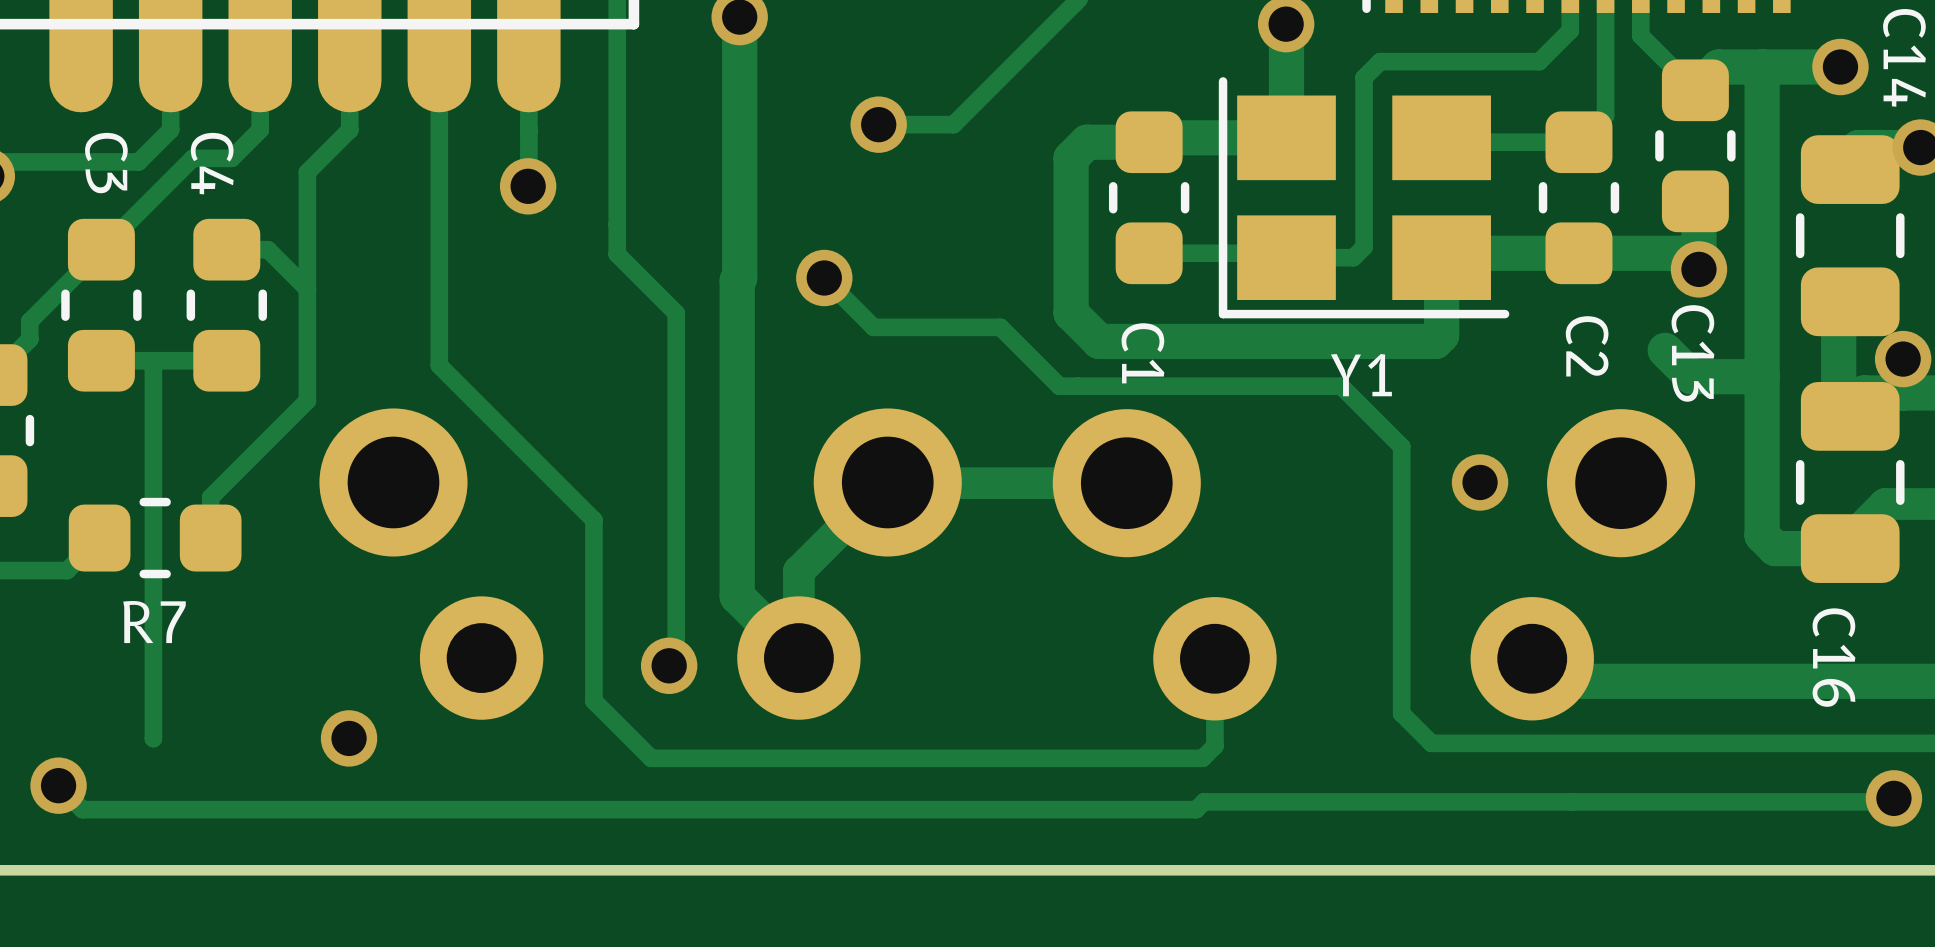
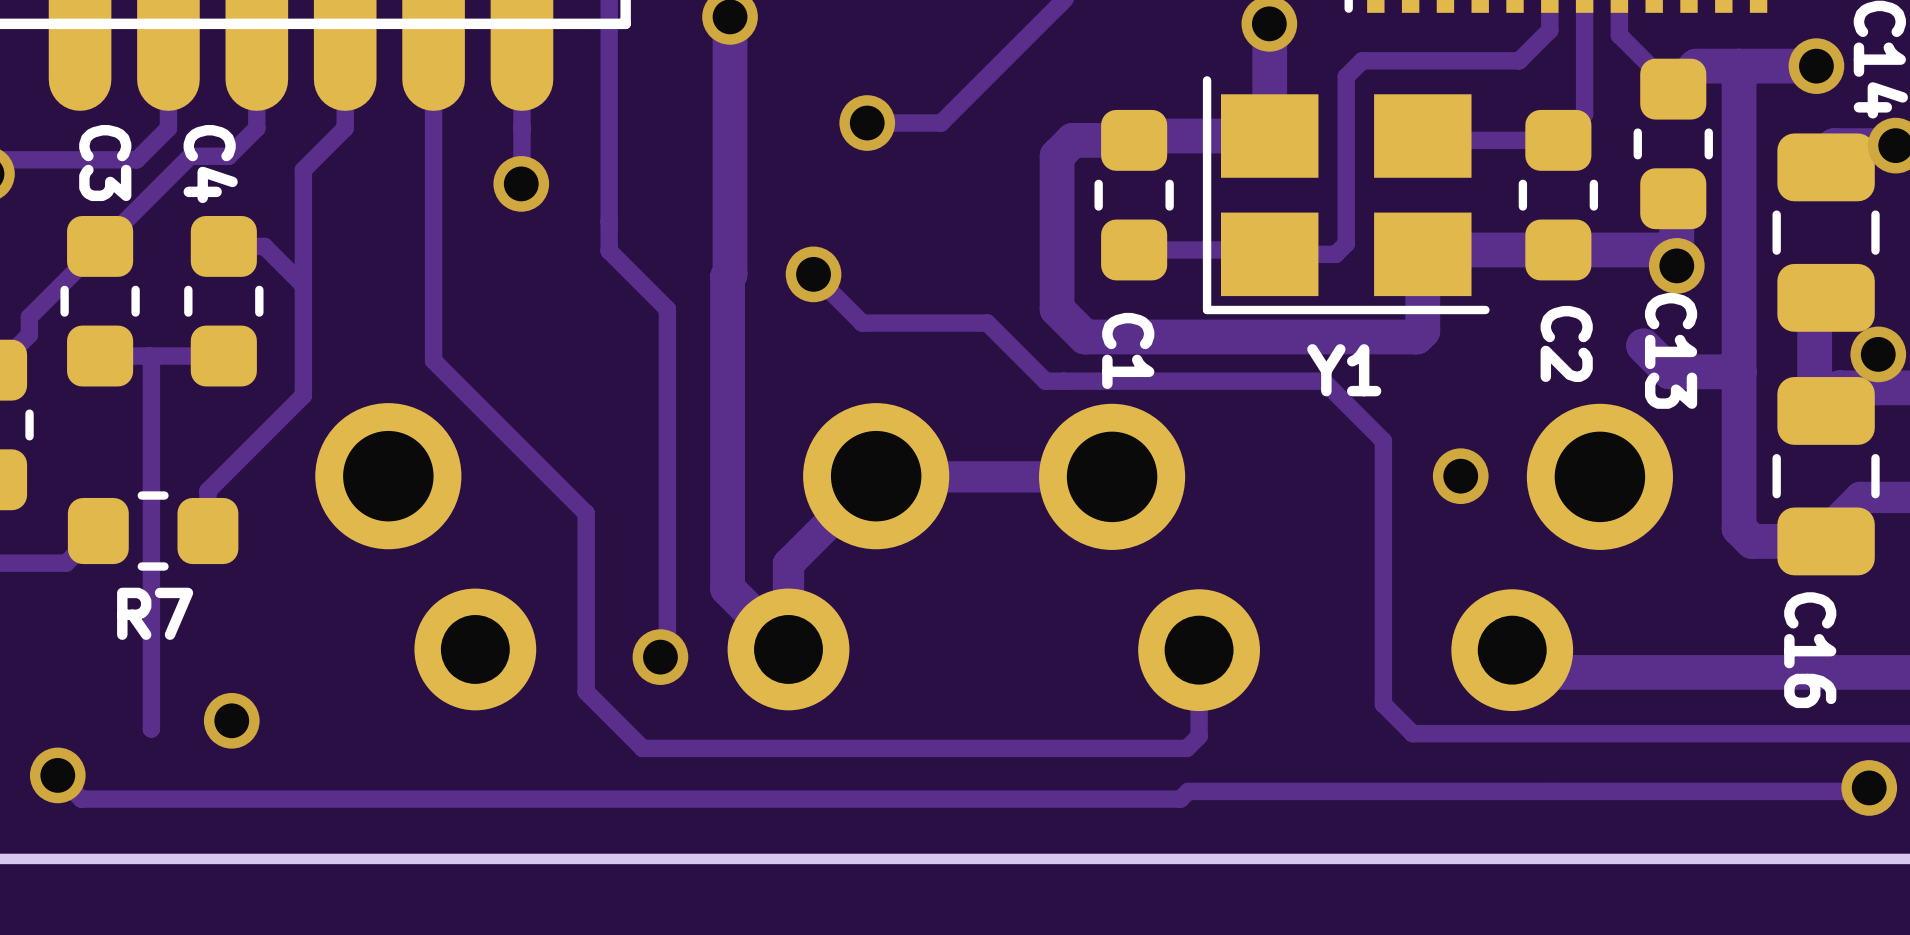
via position: (349, 738) -> (231, 720)

